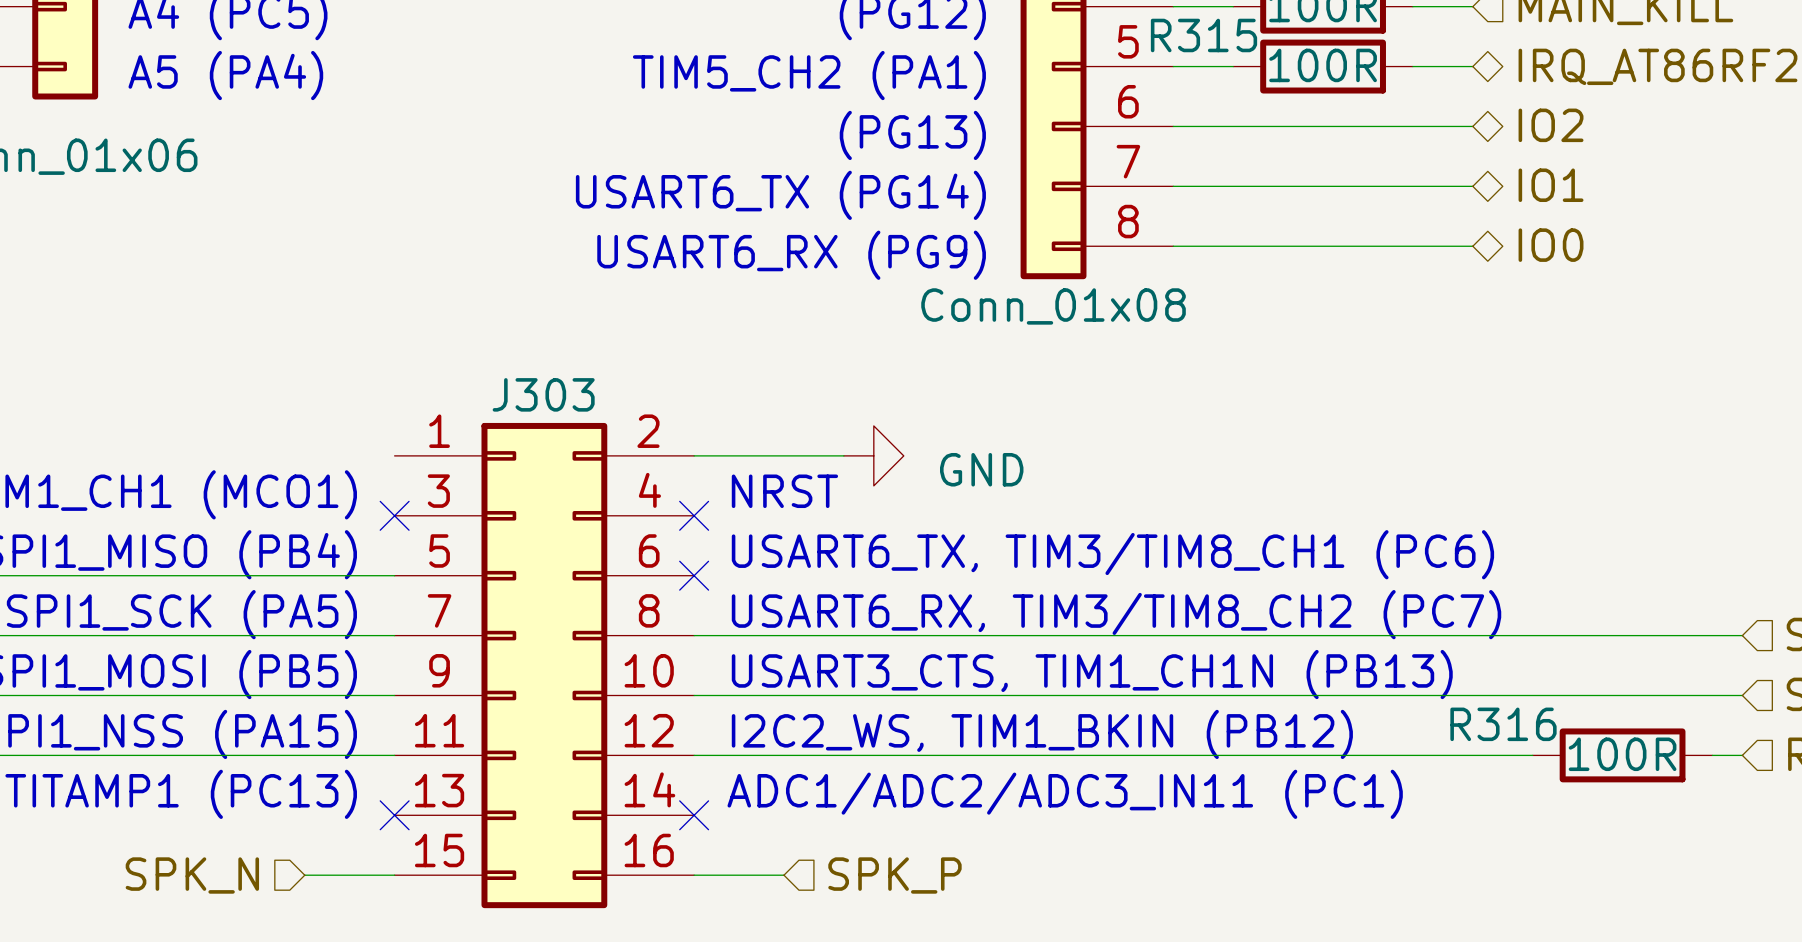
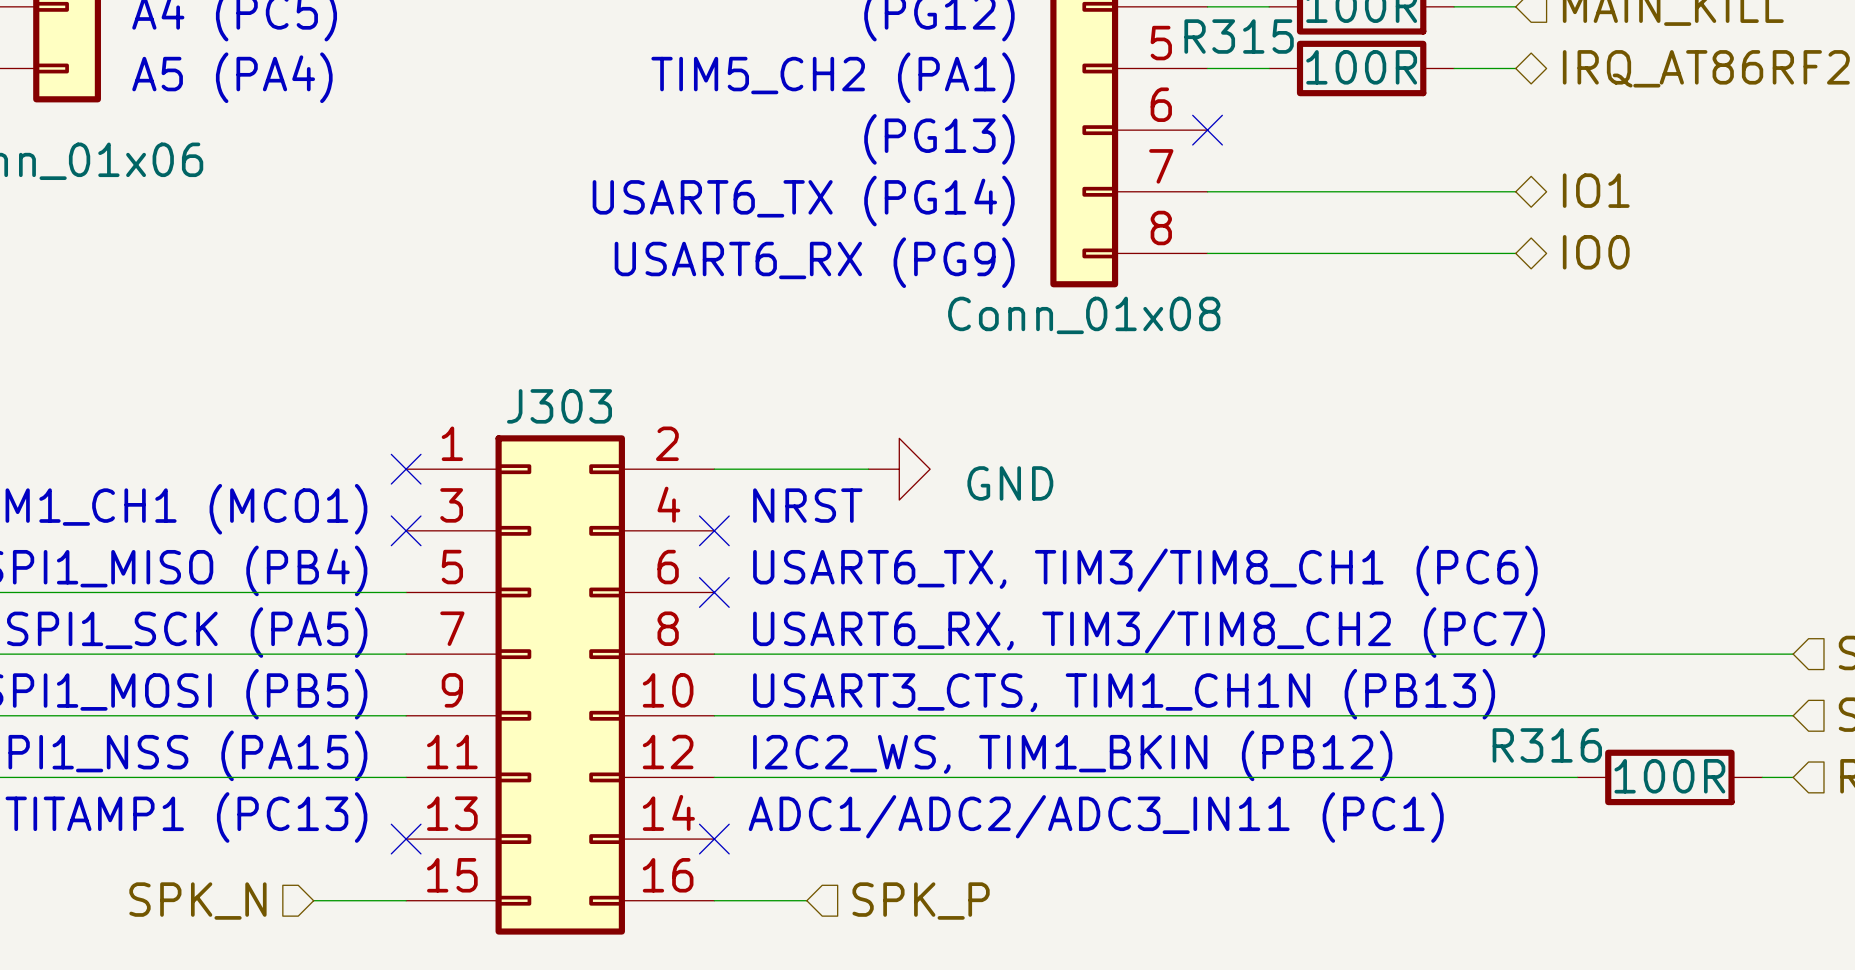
hierarchical label: IO2 (1551, 125) -> none
wire: (1173, 126) (1472, 126) -> none
no-connect mark: none -> (1207, 130)
no-connect mark: none -> (406, 469)

